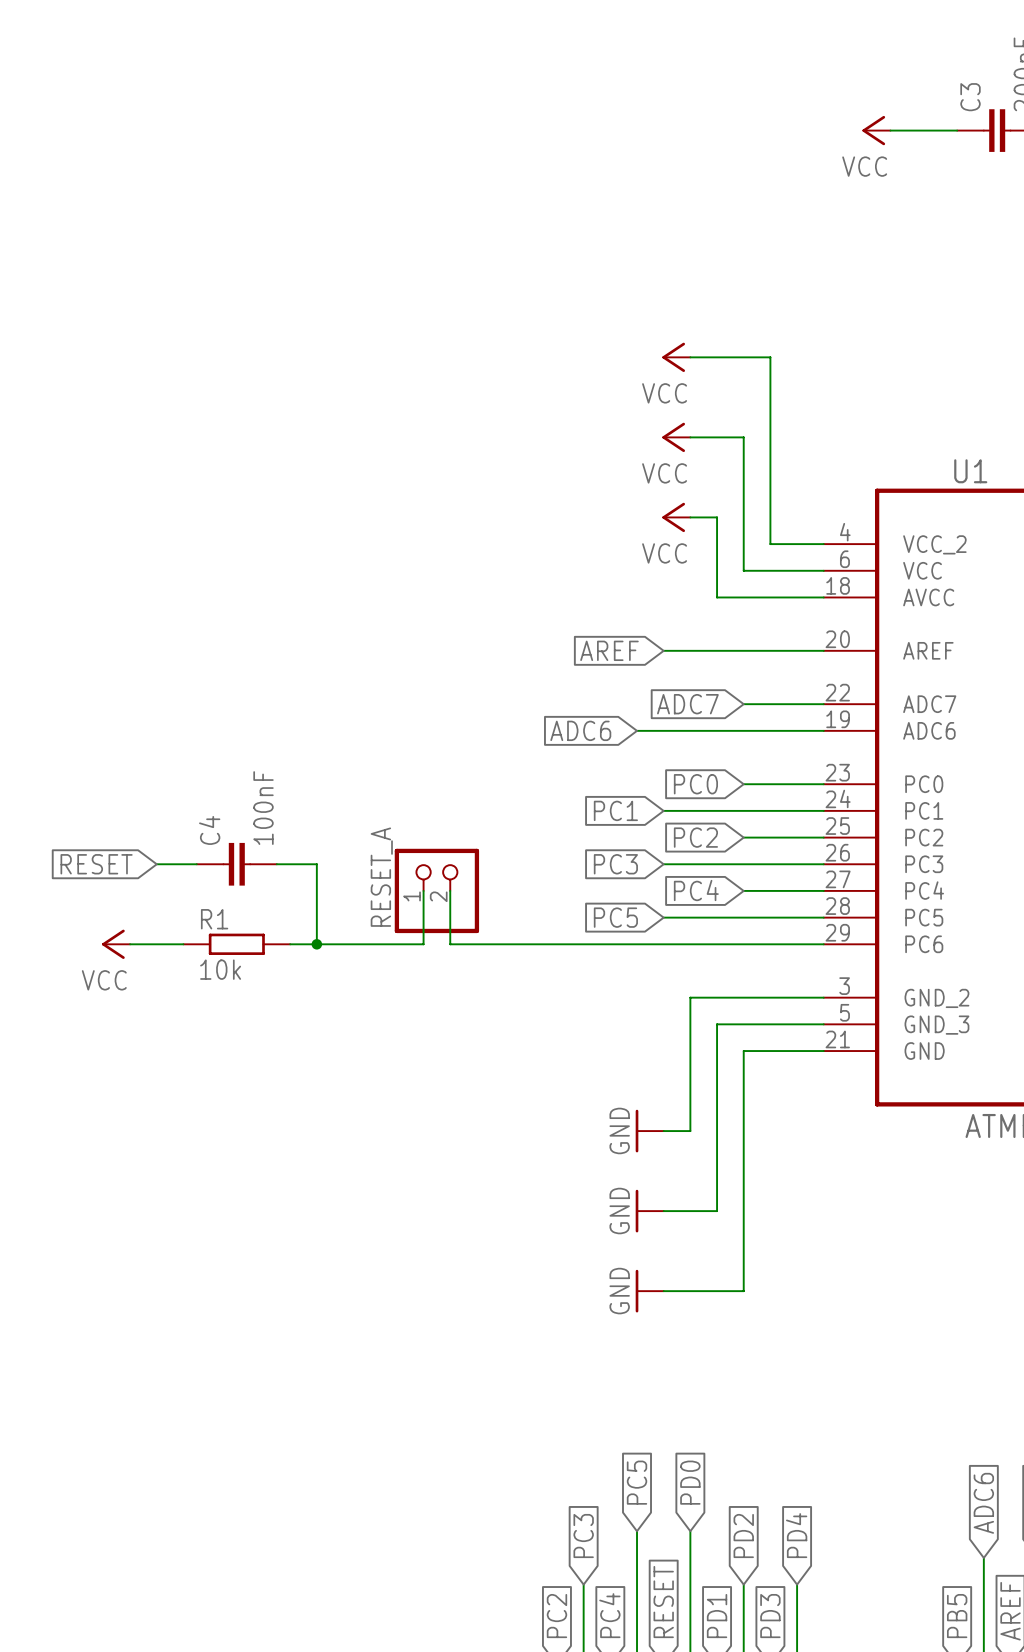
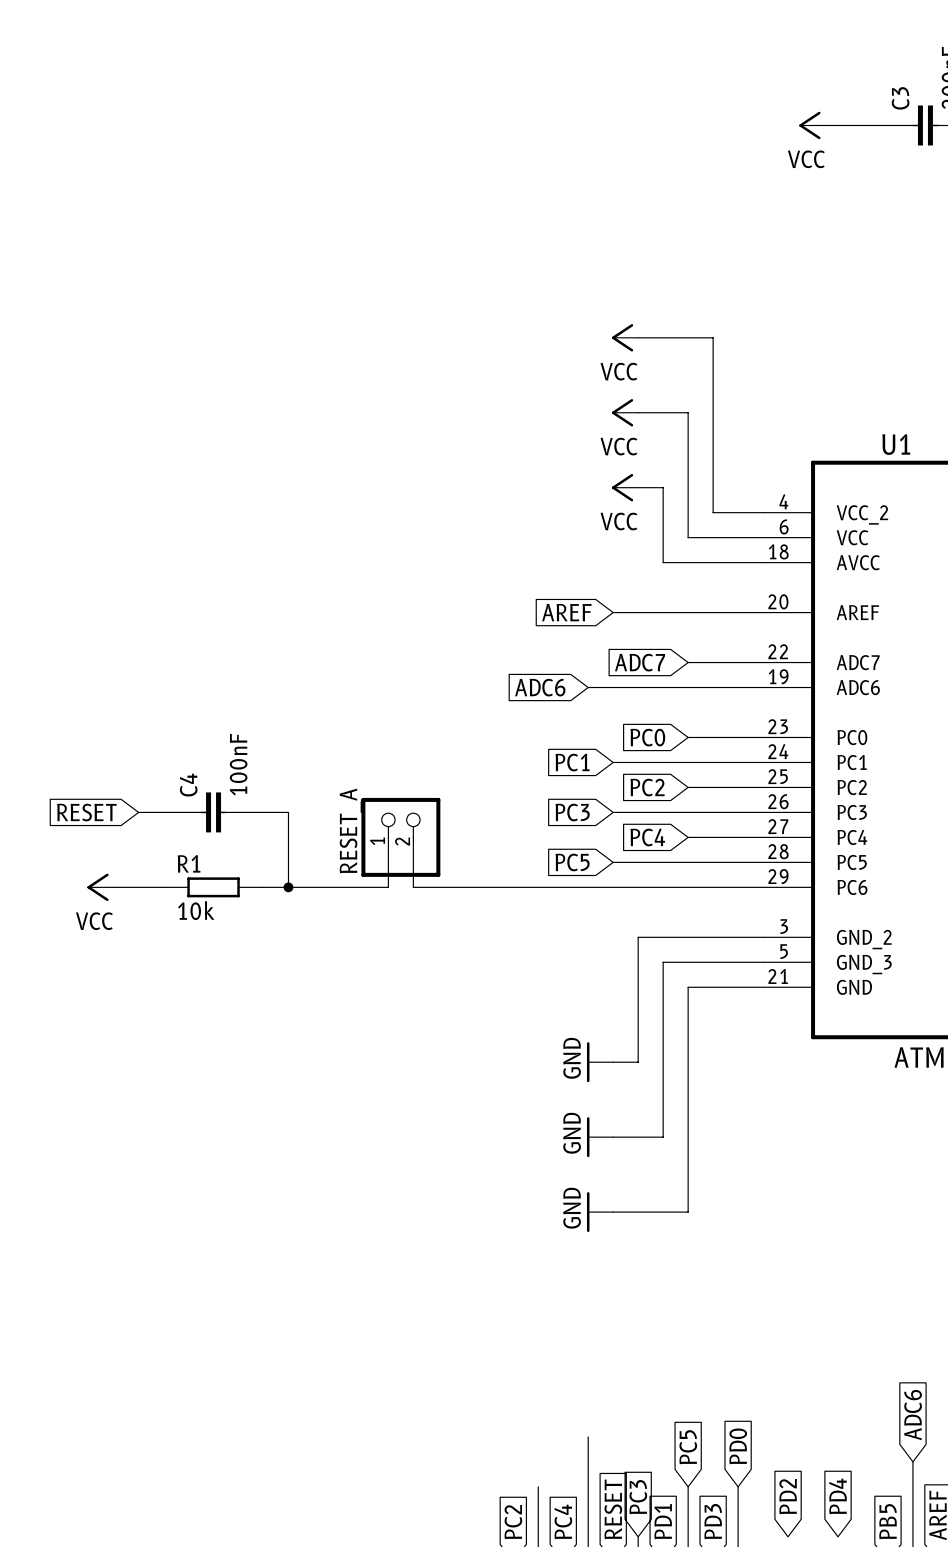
global label: PC5 (637, 1482) -> none
global label: PD0 (690, 1482) -> none
wire: (690, 1531) (690, 1637) -> none
global label: PD4 (796, 1535) -> PD0 (738, 1446)
global label position: PC3 (583, 1536) -> PC3 (638, 1497)
global label: PD2 (743, 1536) -> PC5 (688, 1447)
global label: none -> PD4 (838, 1496)
global label: none -> PD2 (788, 1496)

